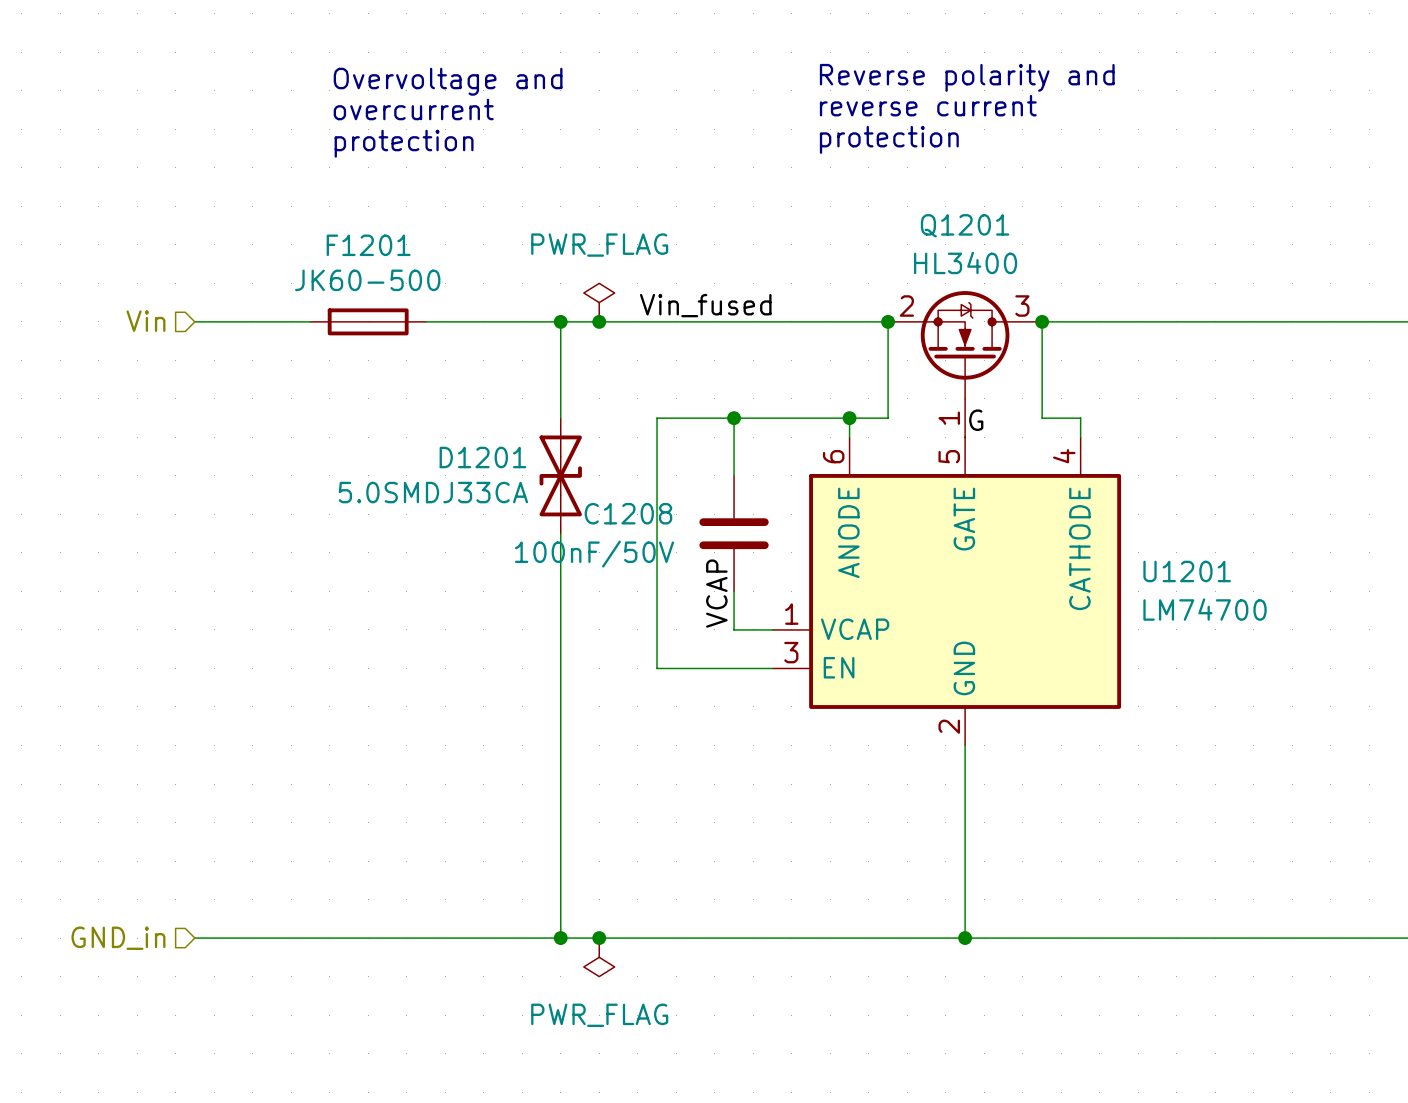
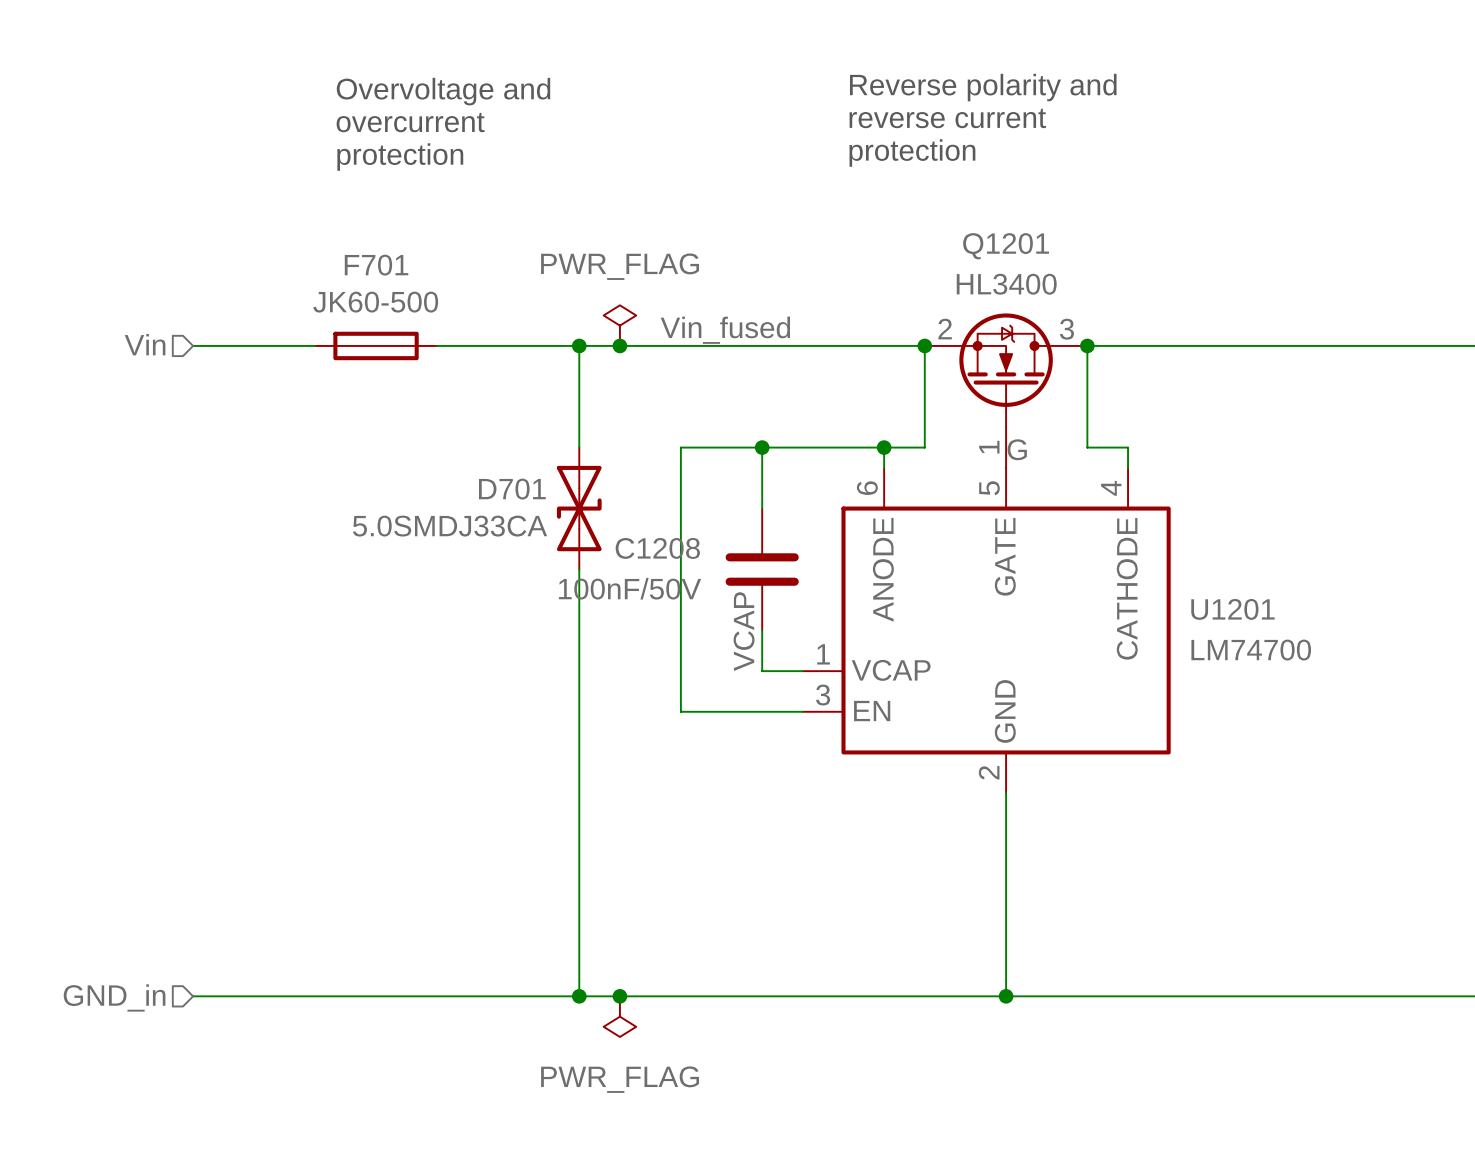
F1201 name: F1201 (368, 245) -> F701 (376, 265)
D1201 name: D1201 (482, 457) -> D701 (512, 489)

